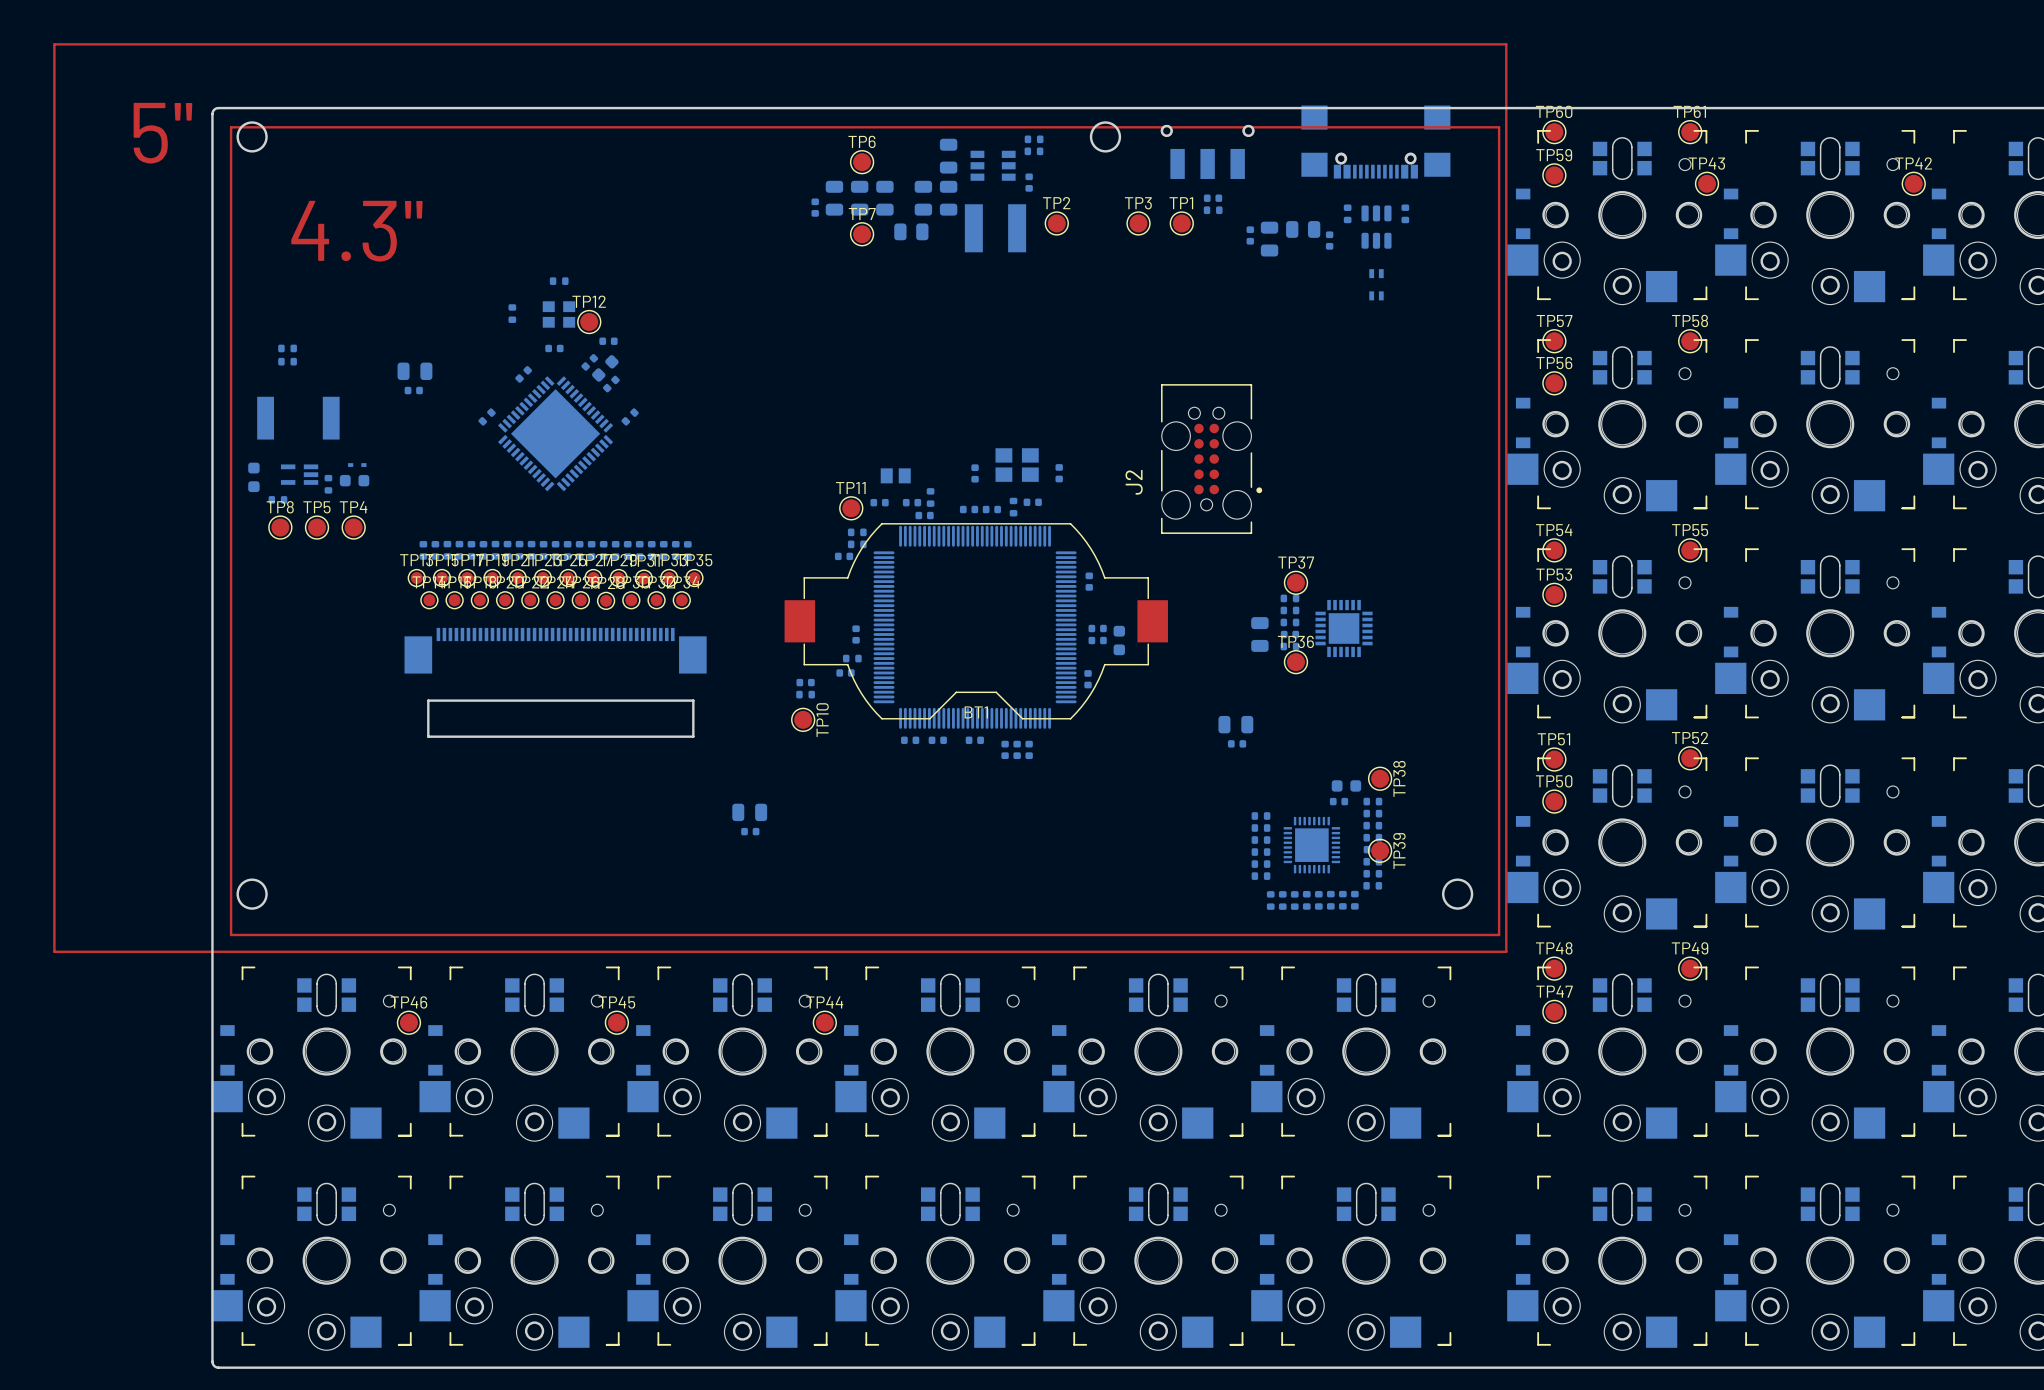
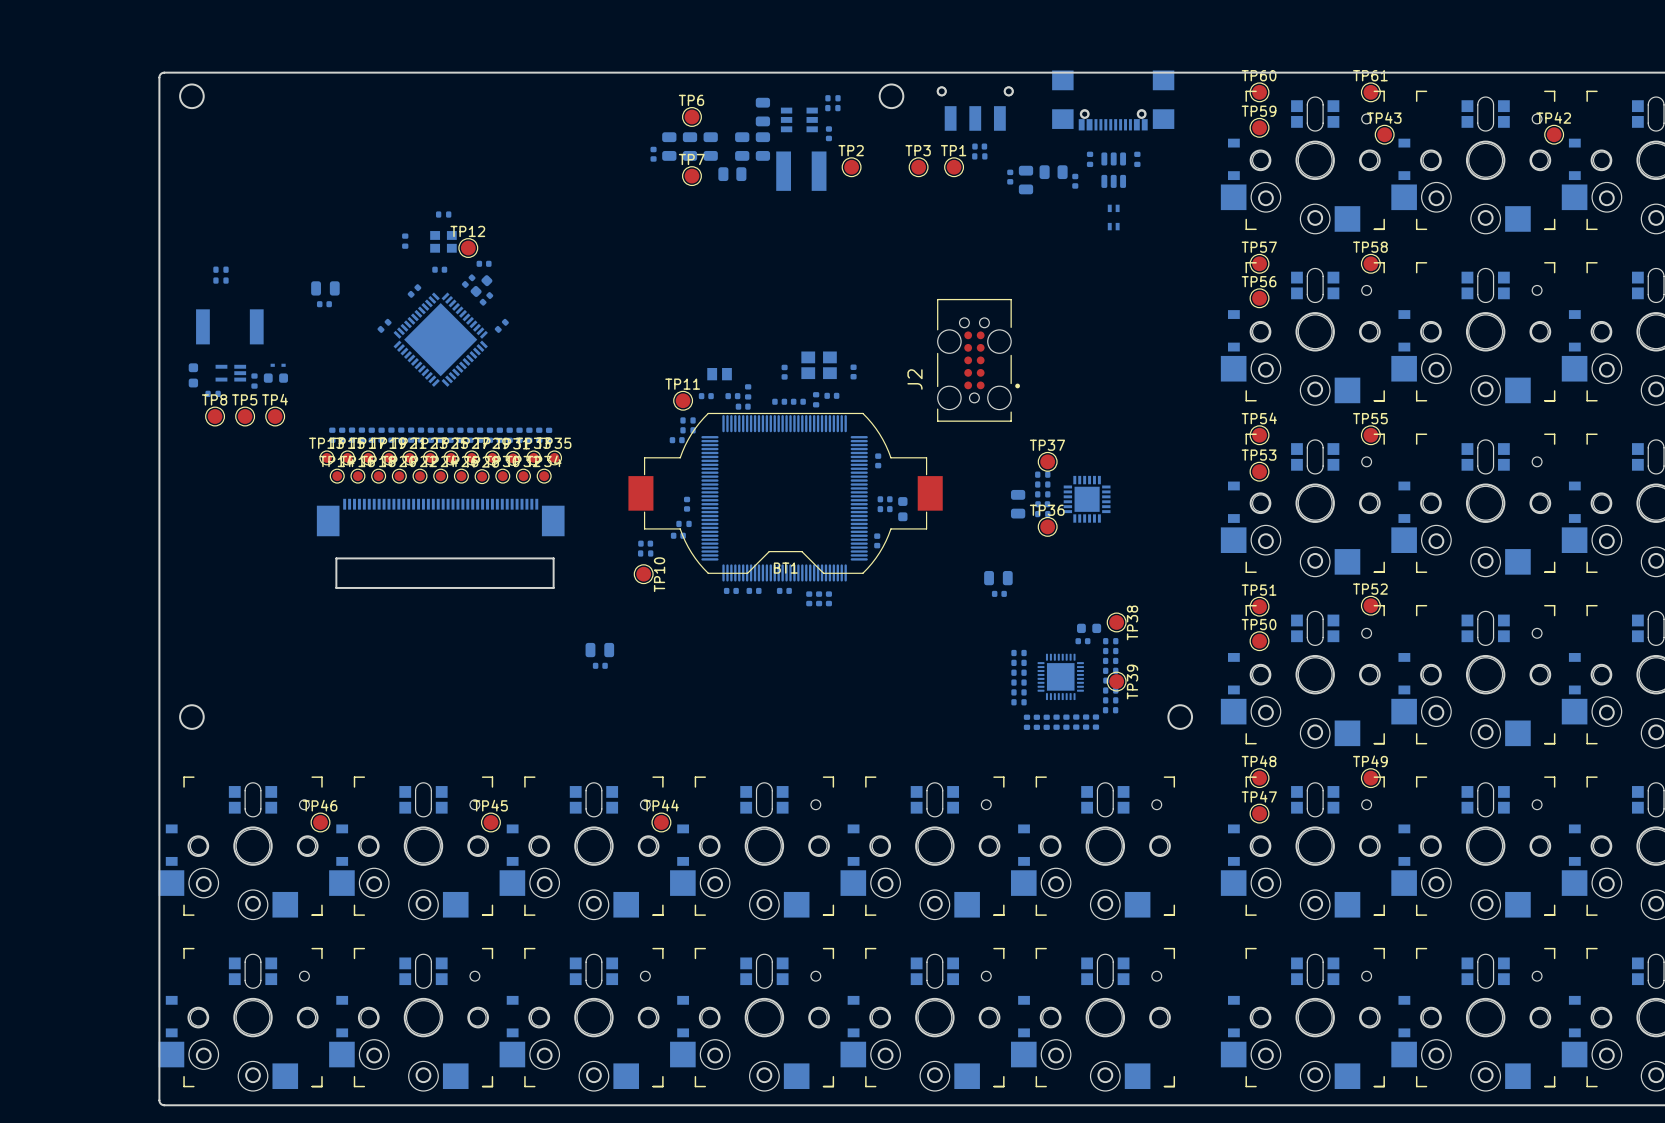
top track: (54, 44) (1506, 44) (1506, 951) (54, 951) (54, 44) -> none
top track: (231, 127) (1499, 127) (1499, 934) (231, 934) (231, 127) -> none
text: 5'' (162, 133) -> none
text: 4.3'' (356, 231) -> none

